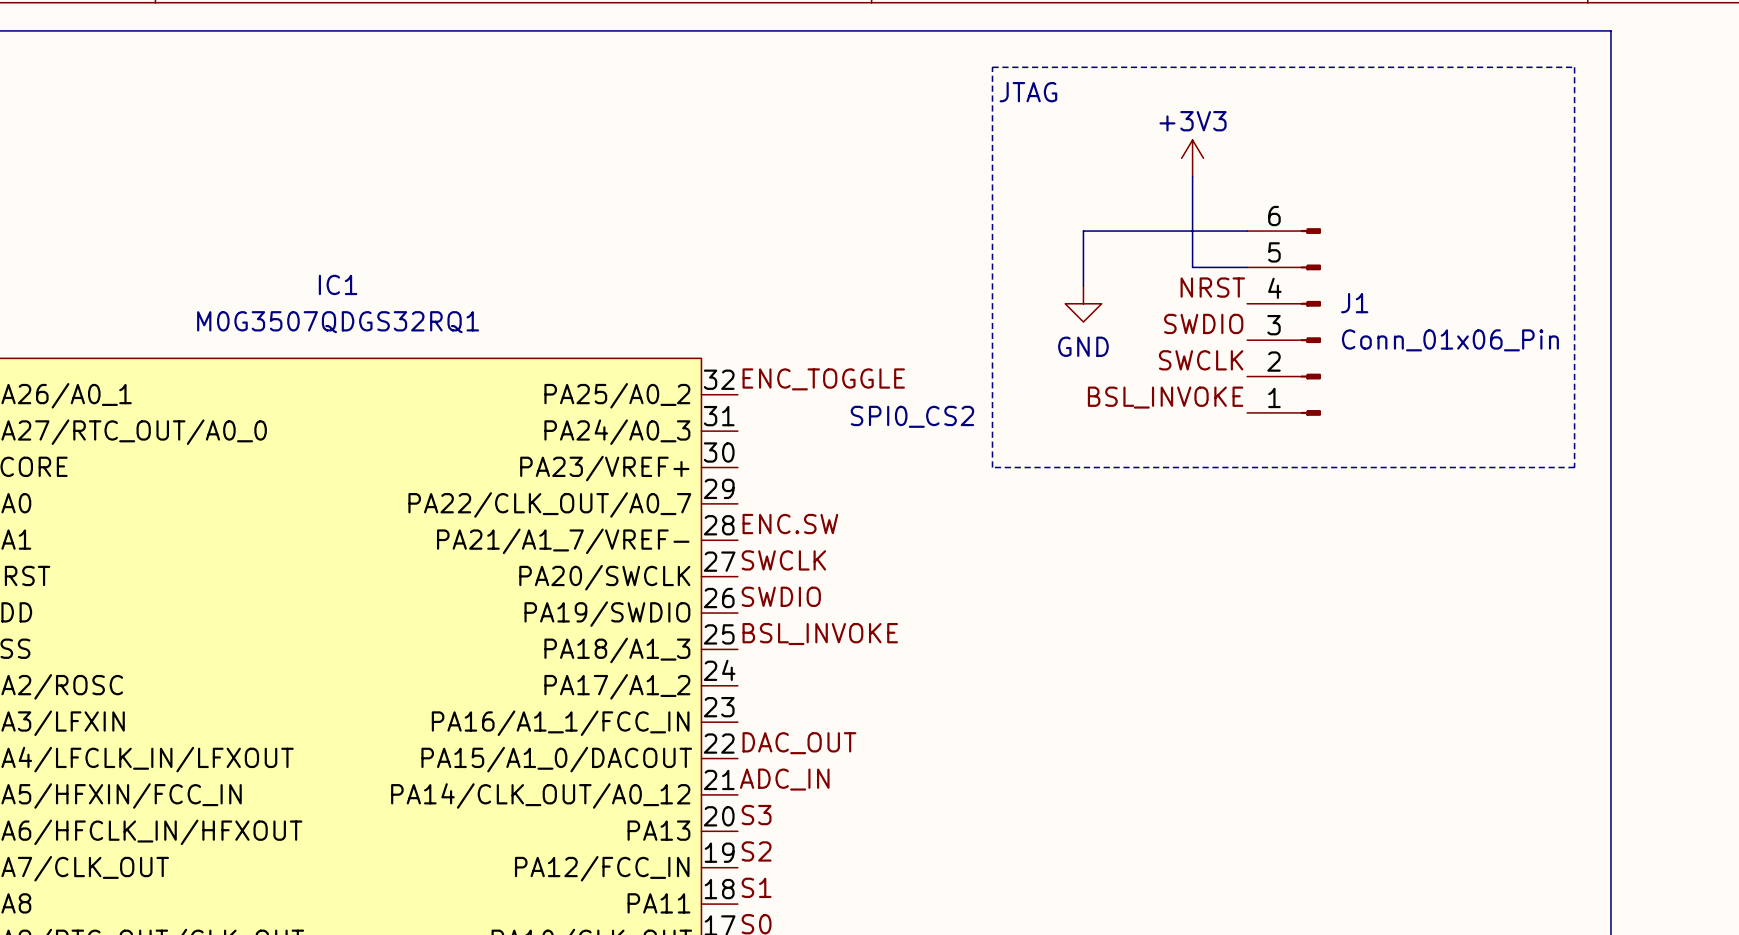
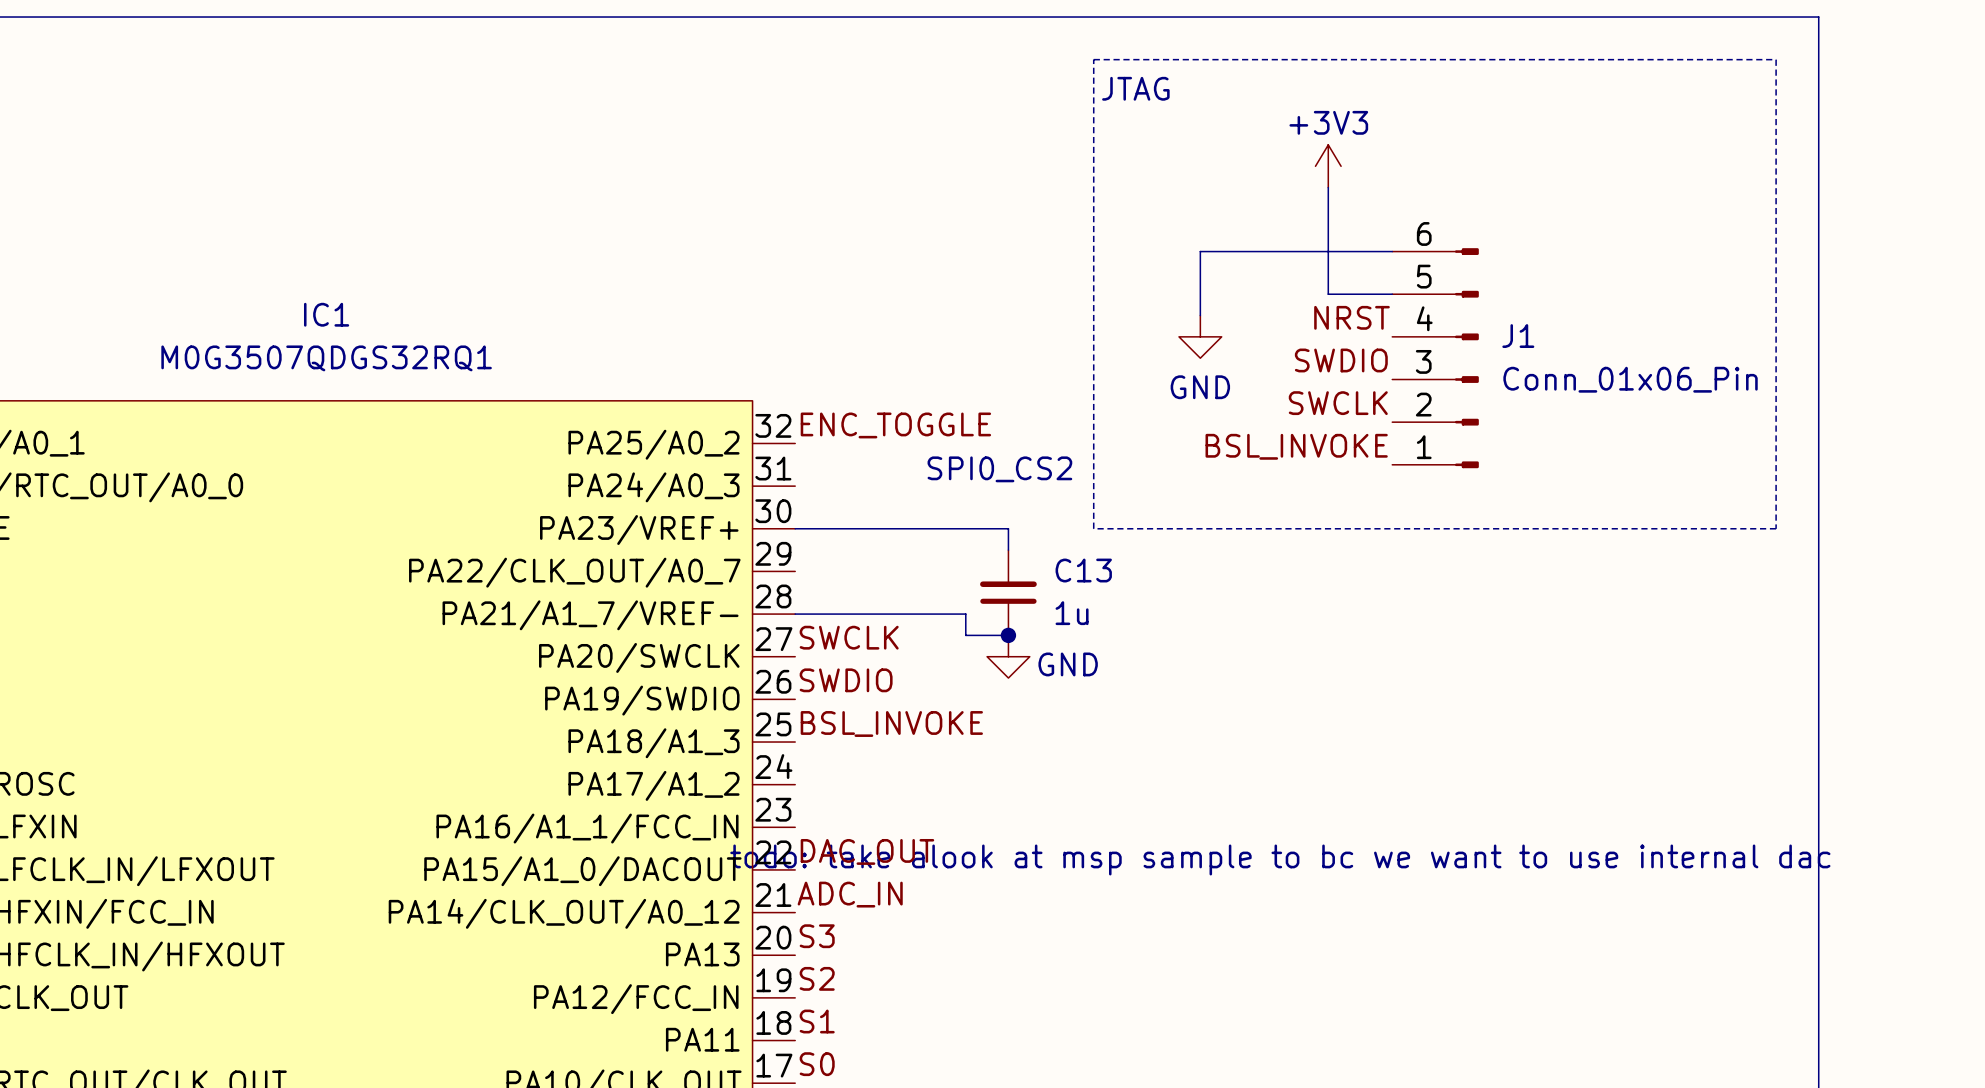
wire: none -> (795, 528) (1008, 528) (1008, 550)
C13: none -> 1u (1008, 592)
label: ENC.SW (790, 524) -> none
wire: none -> (795, 614) (965, 614) (965, 635) (1008, 635)
junction: none -> (1008, 635)
power symbol: none -> GND (1008, 656)
text: none -> todo: take alook at msp sample to bc we want to use internal dac (1280, 859)

